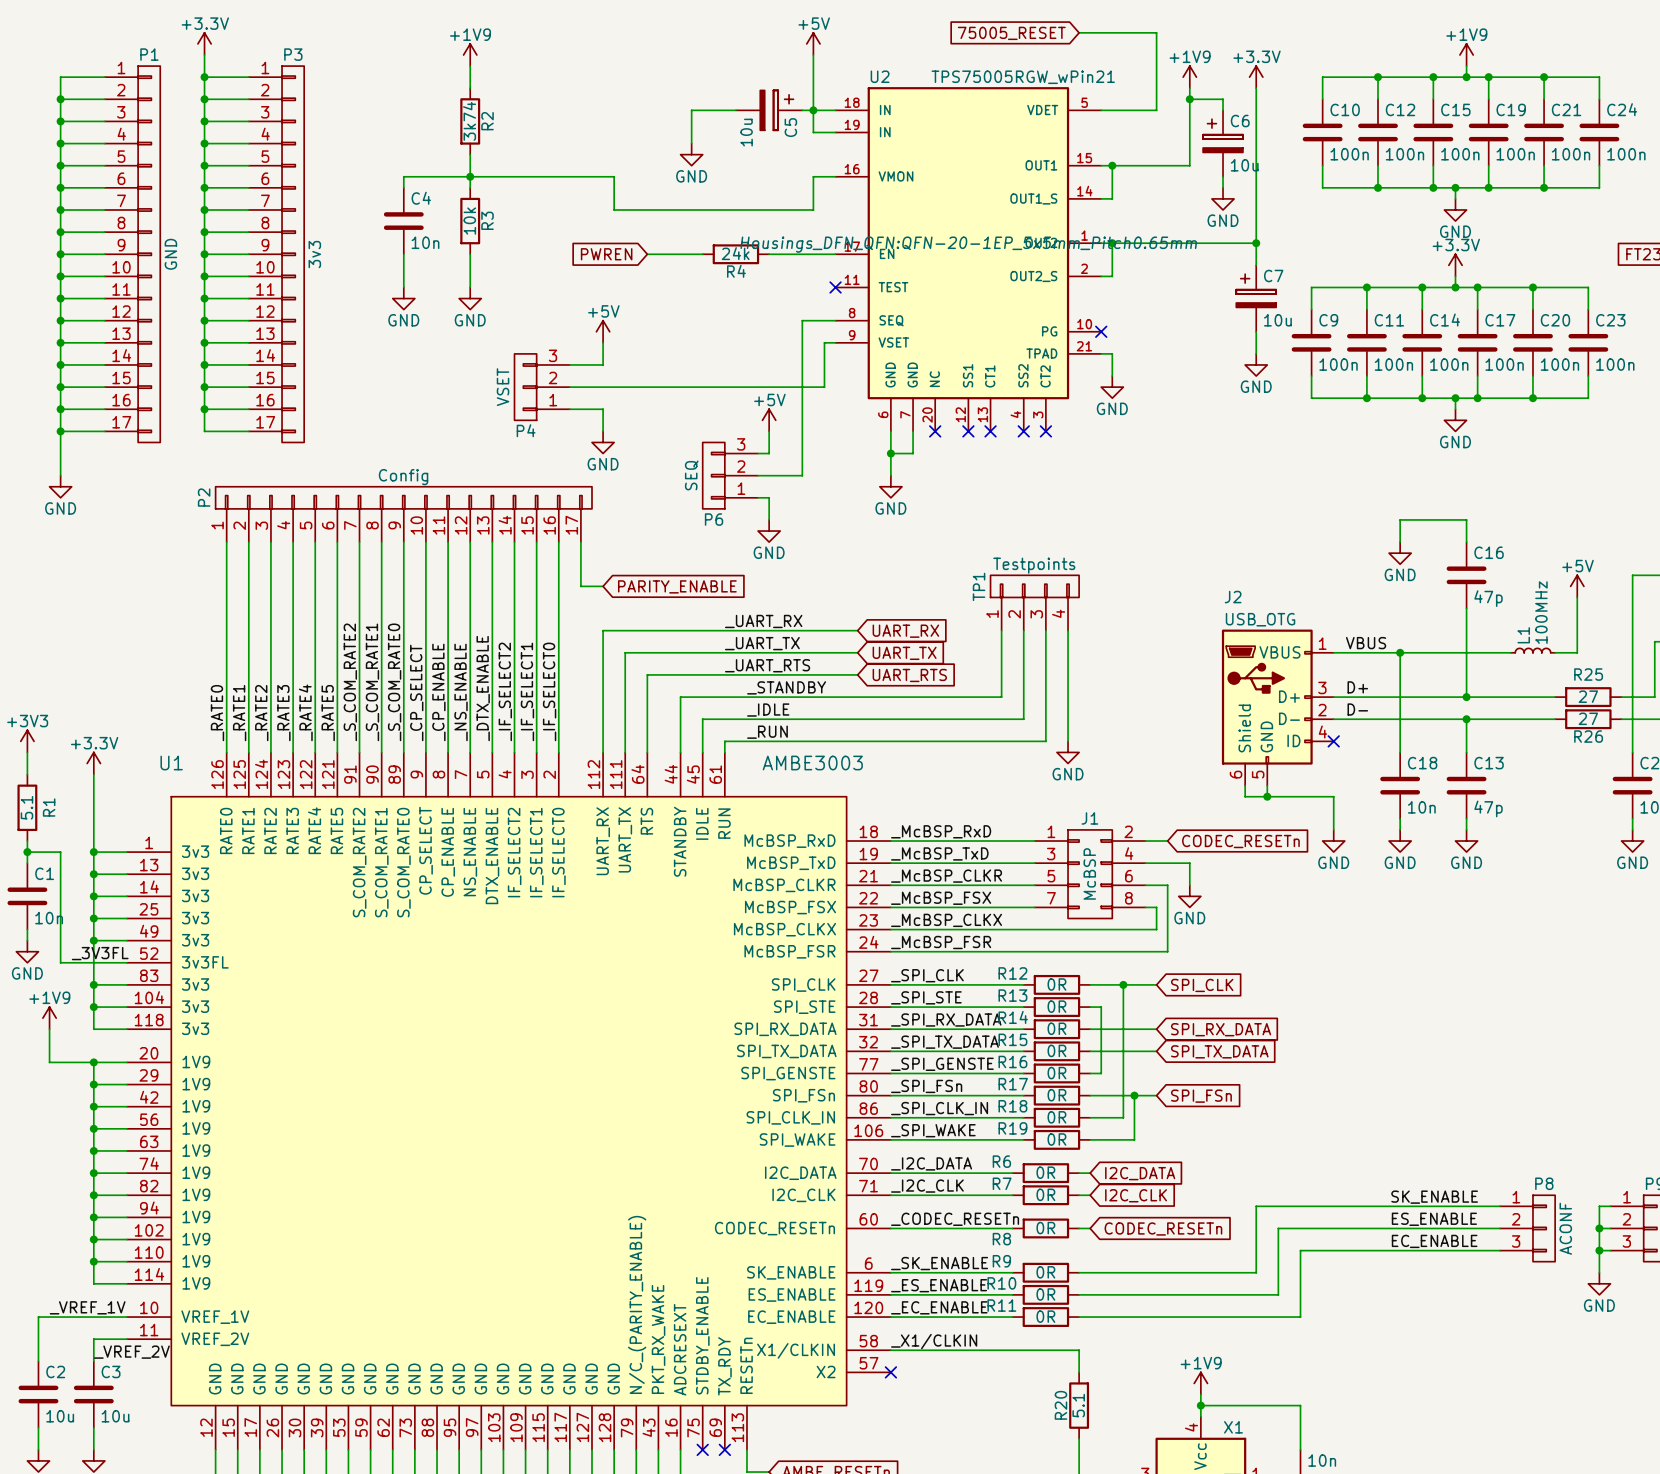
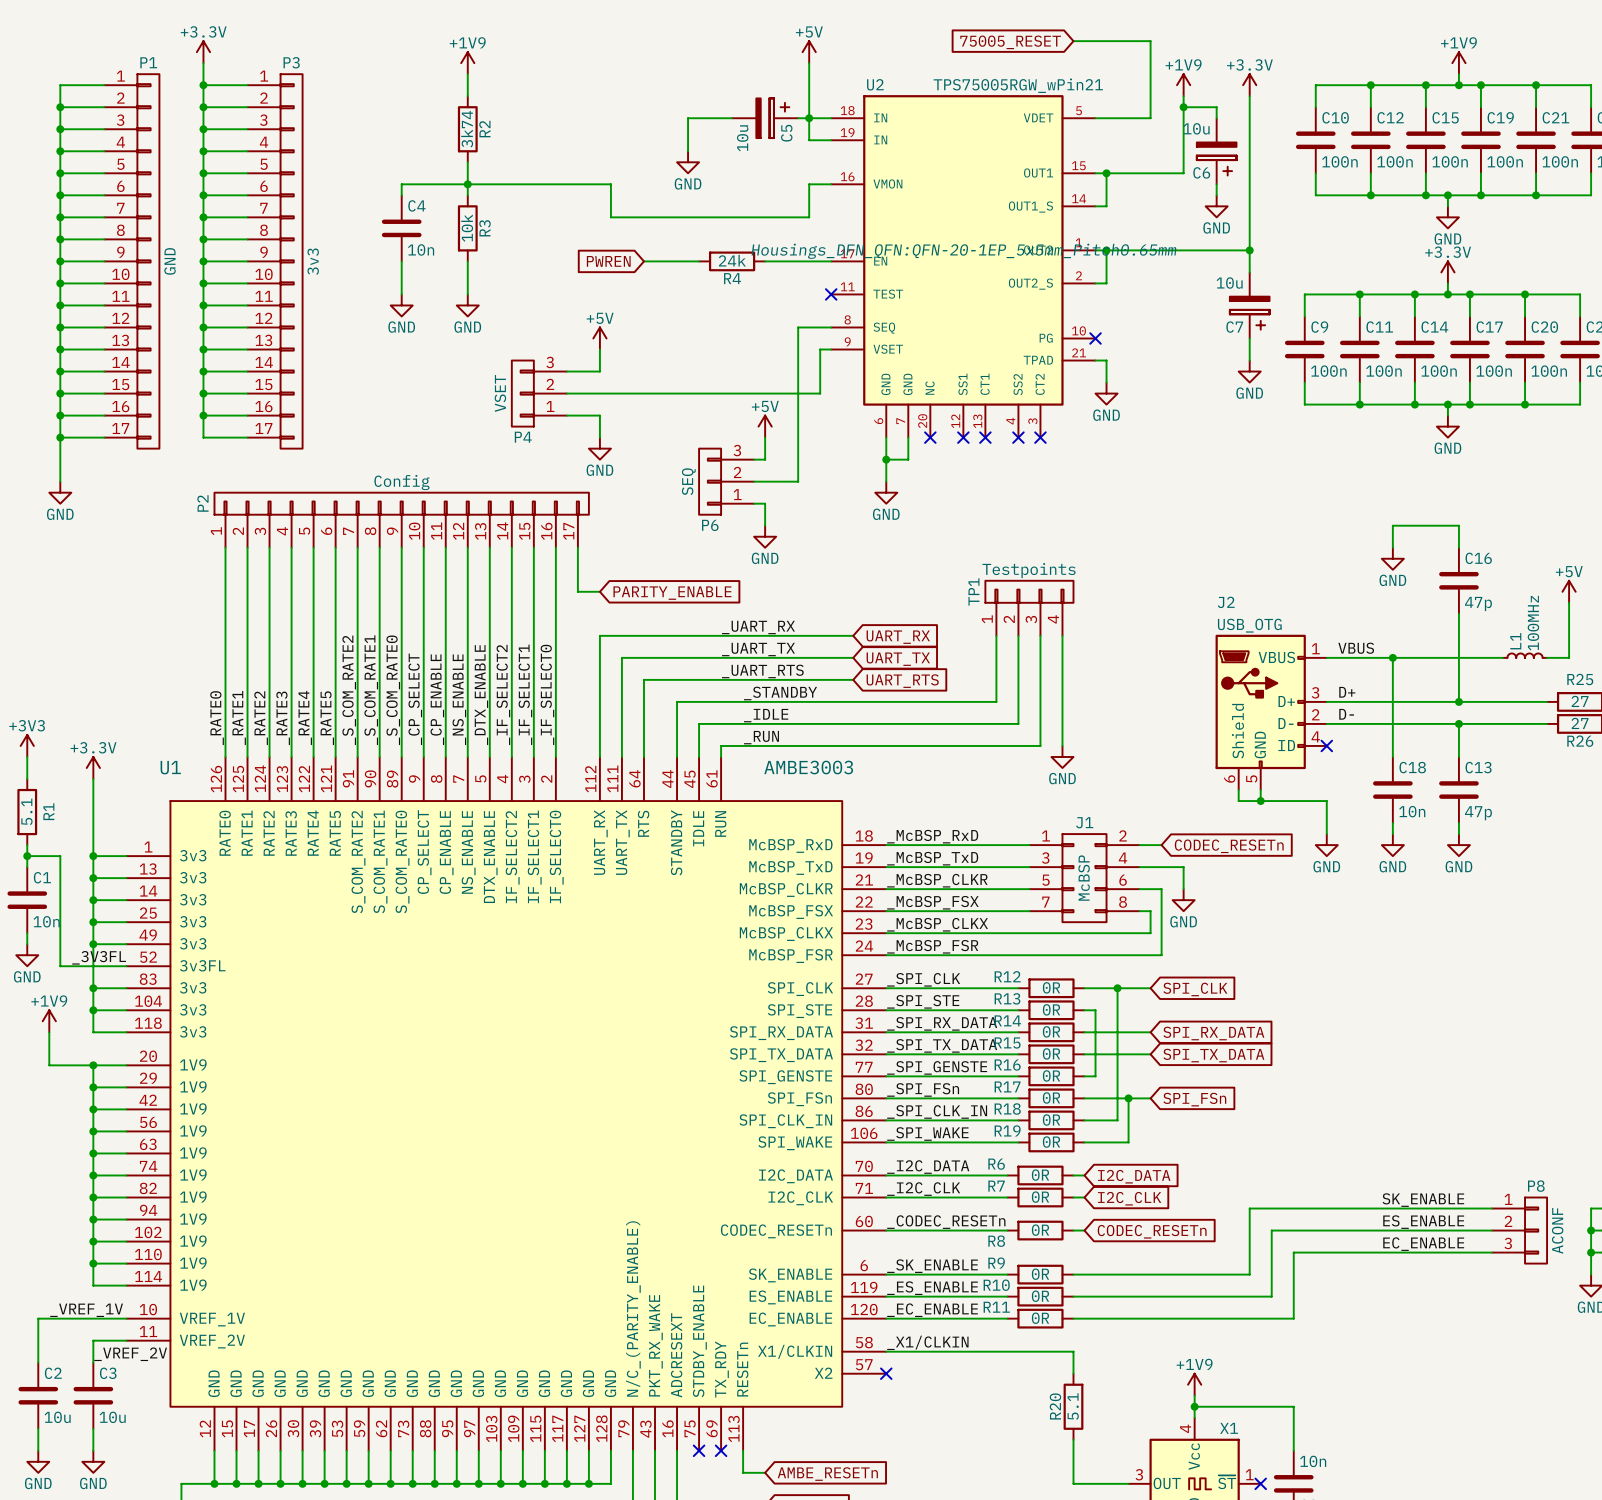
C6 rotation: 0° (1223, 135) -> 180° (1216, 158)
C7 rotation: 0° (1256, 290) -> 180° (1249, 313)

